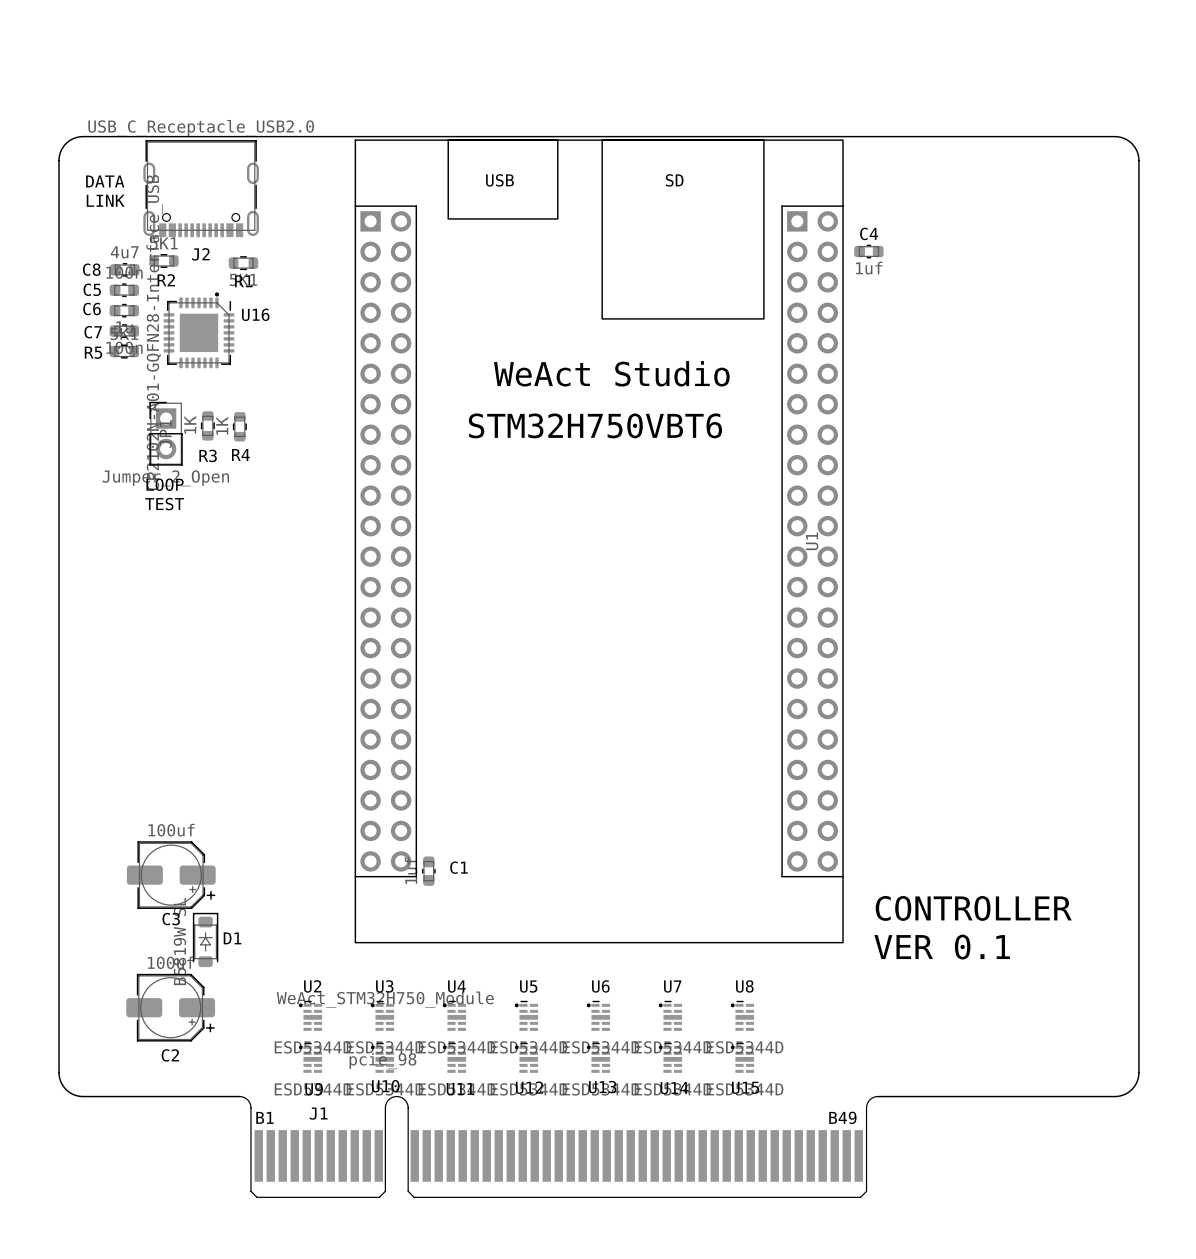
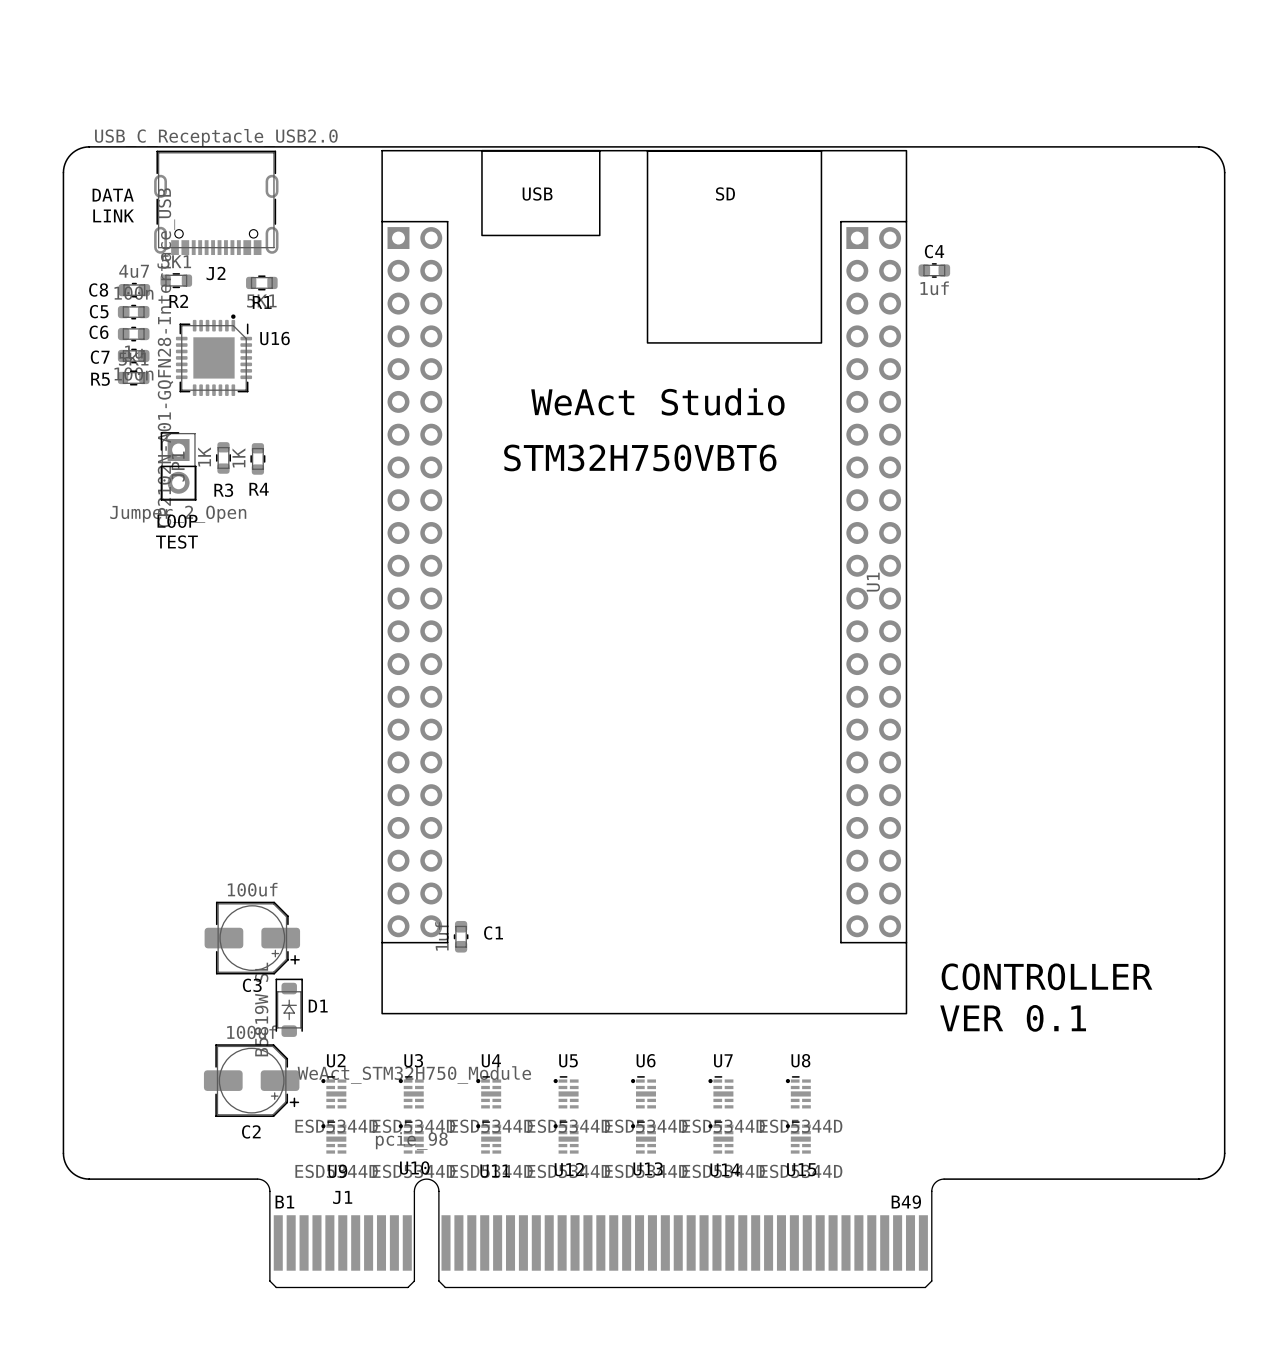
C3 position: (171, 875) -> (252, 938)
D1 position: (205, 939) -> (289, 1007)
C2 position: (170, 1007) -> (251, 1080)

